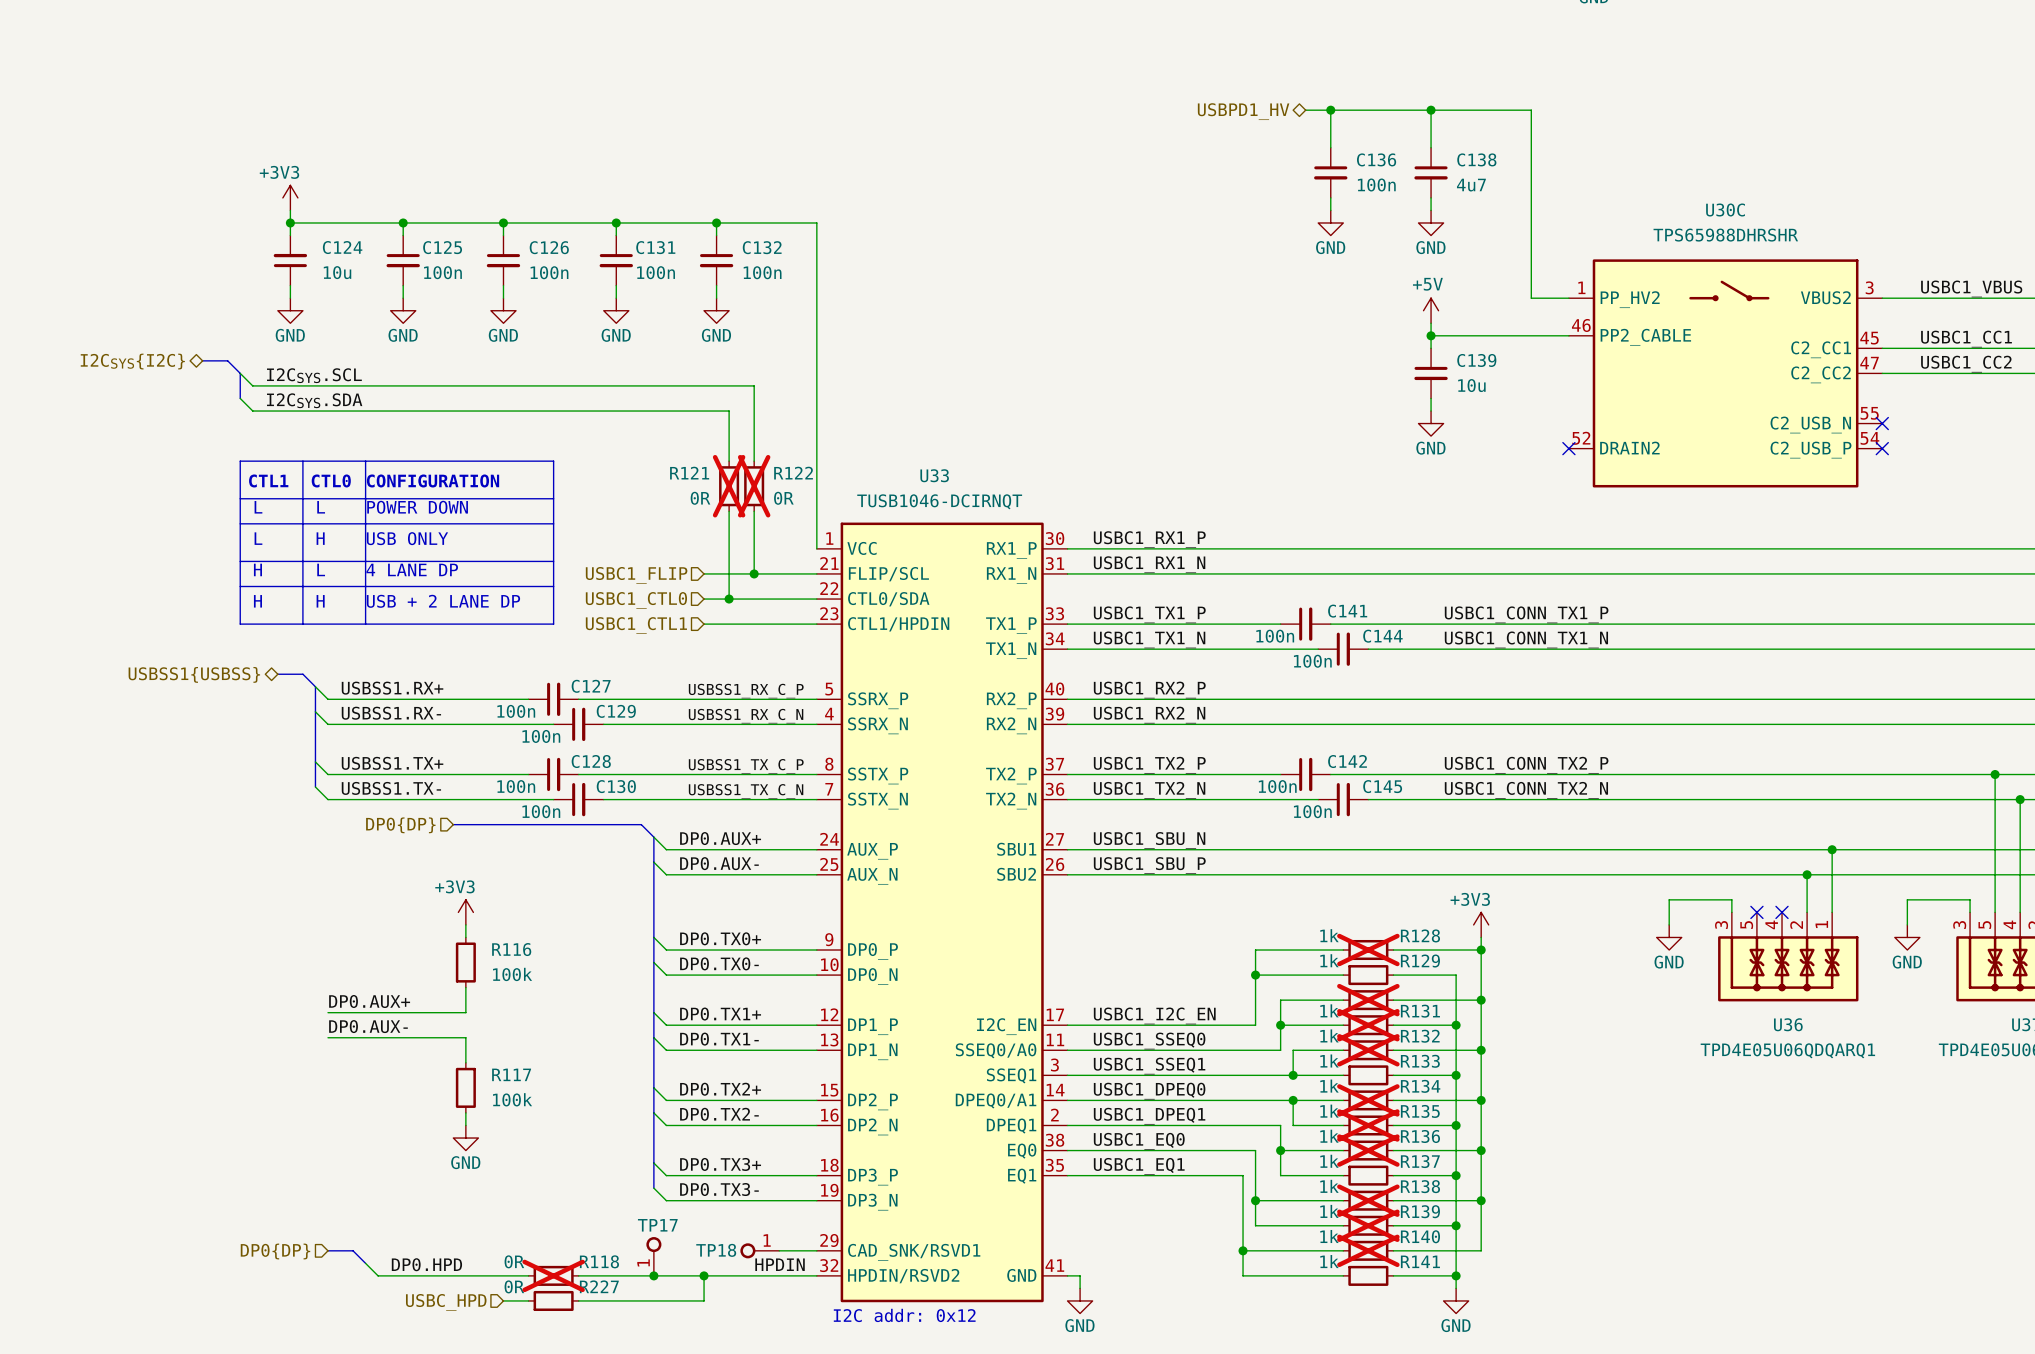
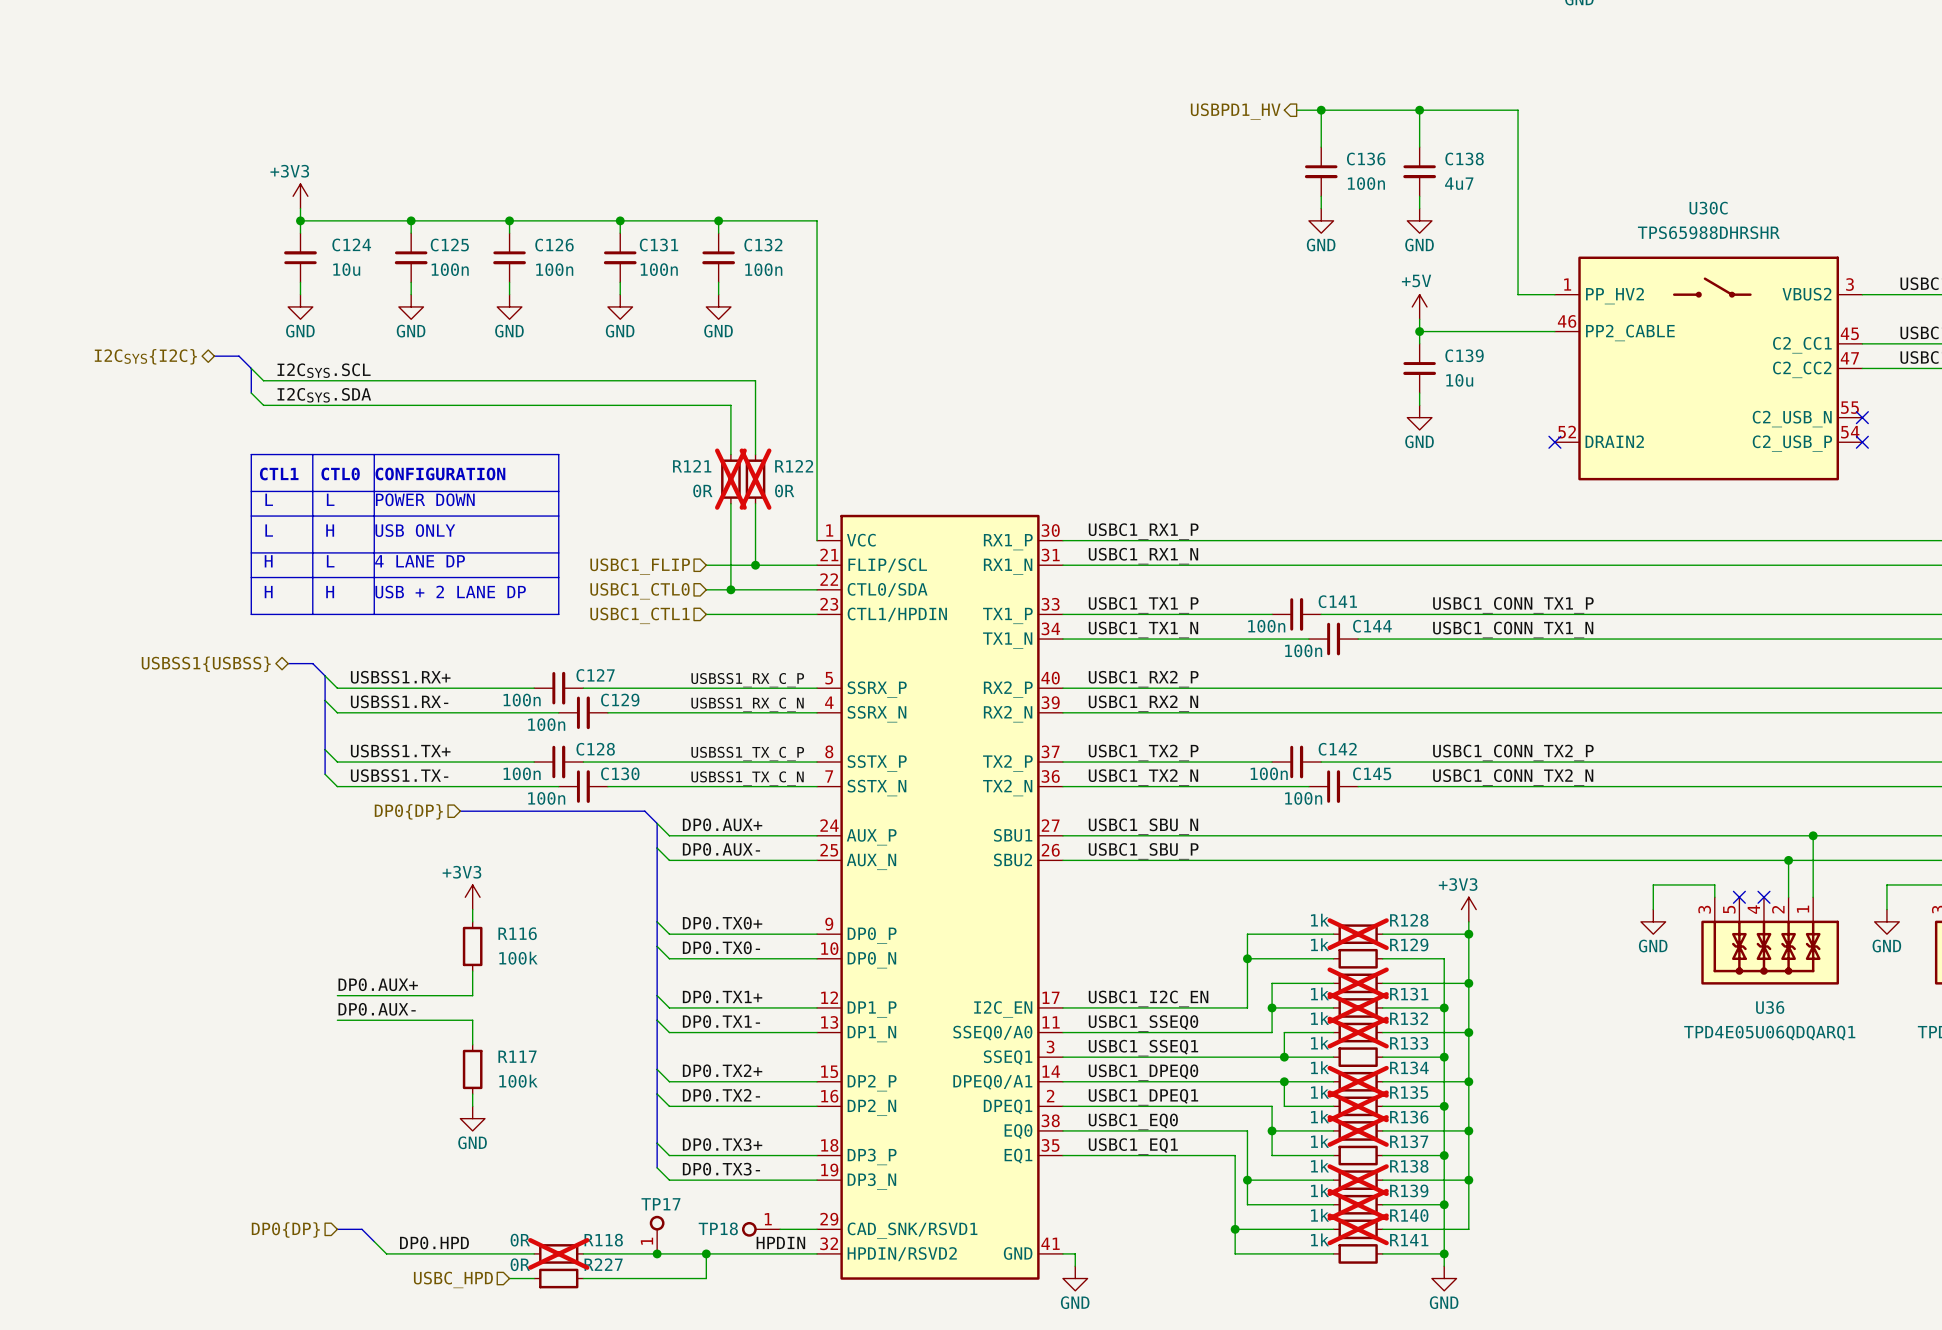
hierarchical label shape: bidirectional (1243, 111) -> output (1235, 111)
U33 name: U33 (934, 475) -> none
U33 text: TUSB1046-DCIRNQT (939, 501) -> none
text: I2C addr: 0x12 (904, 1315) -> none

